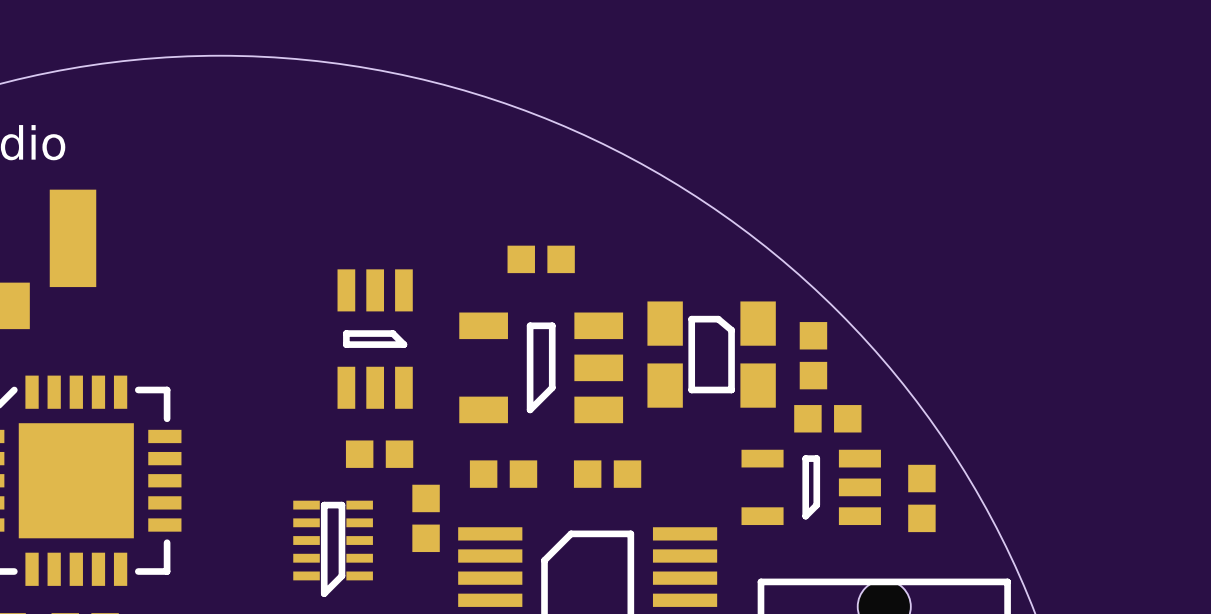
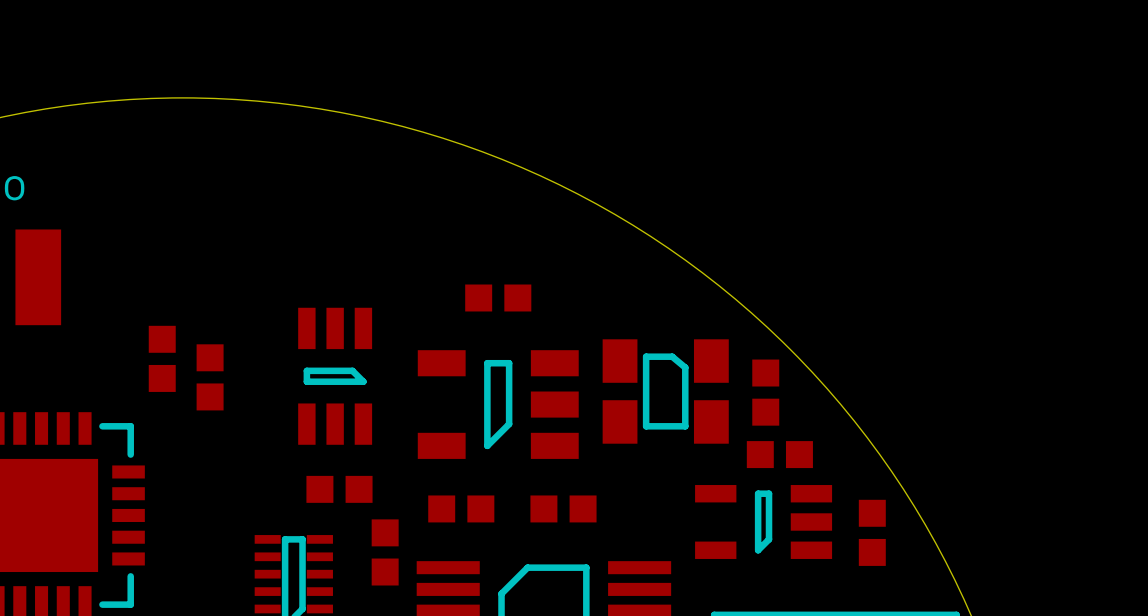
part: none -> (162, 358)
part: none -> (210, 377)

